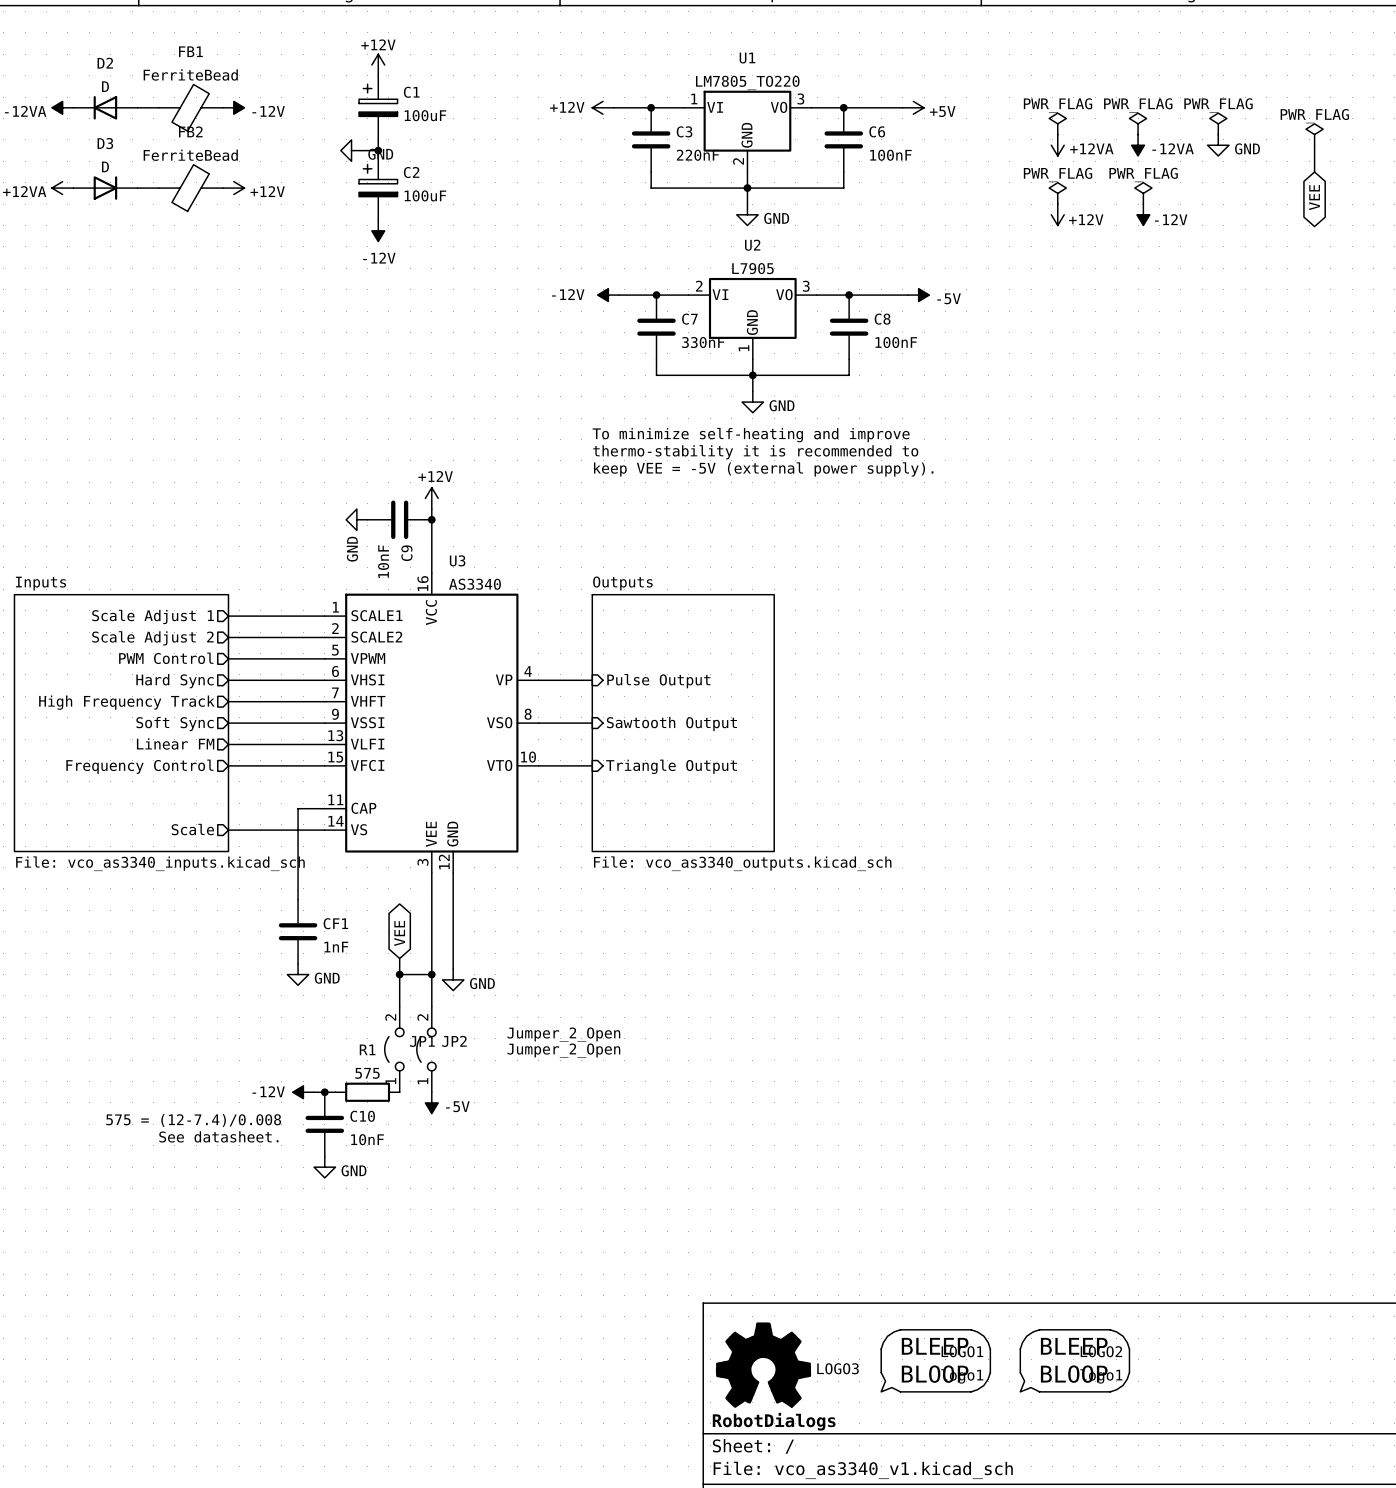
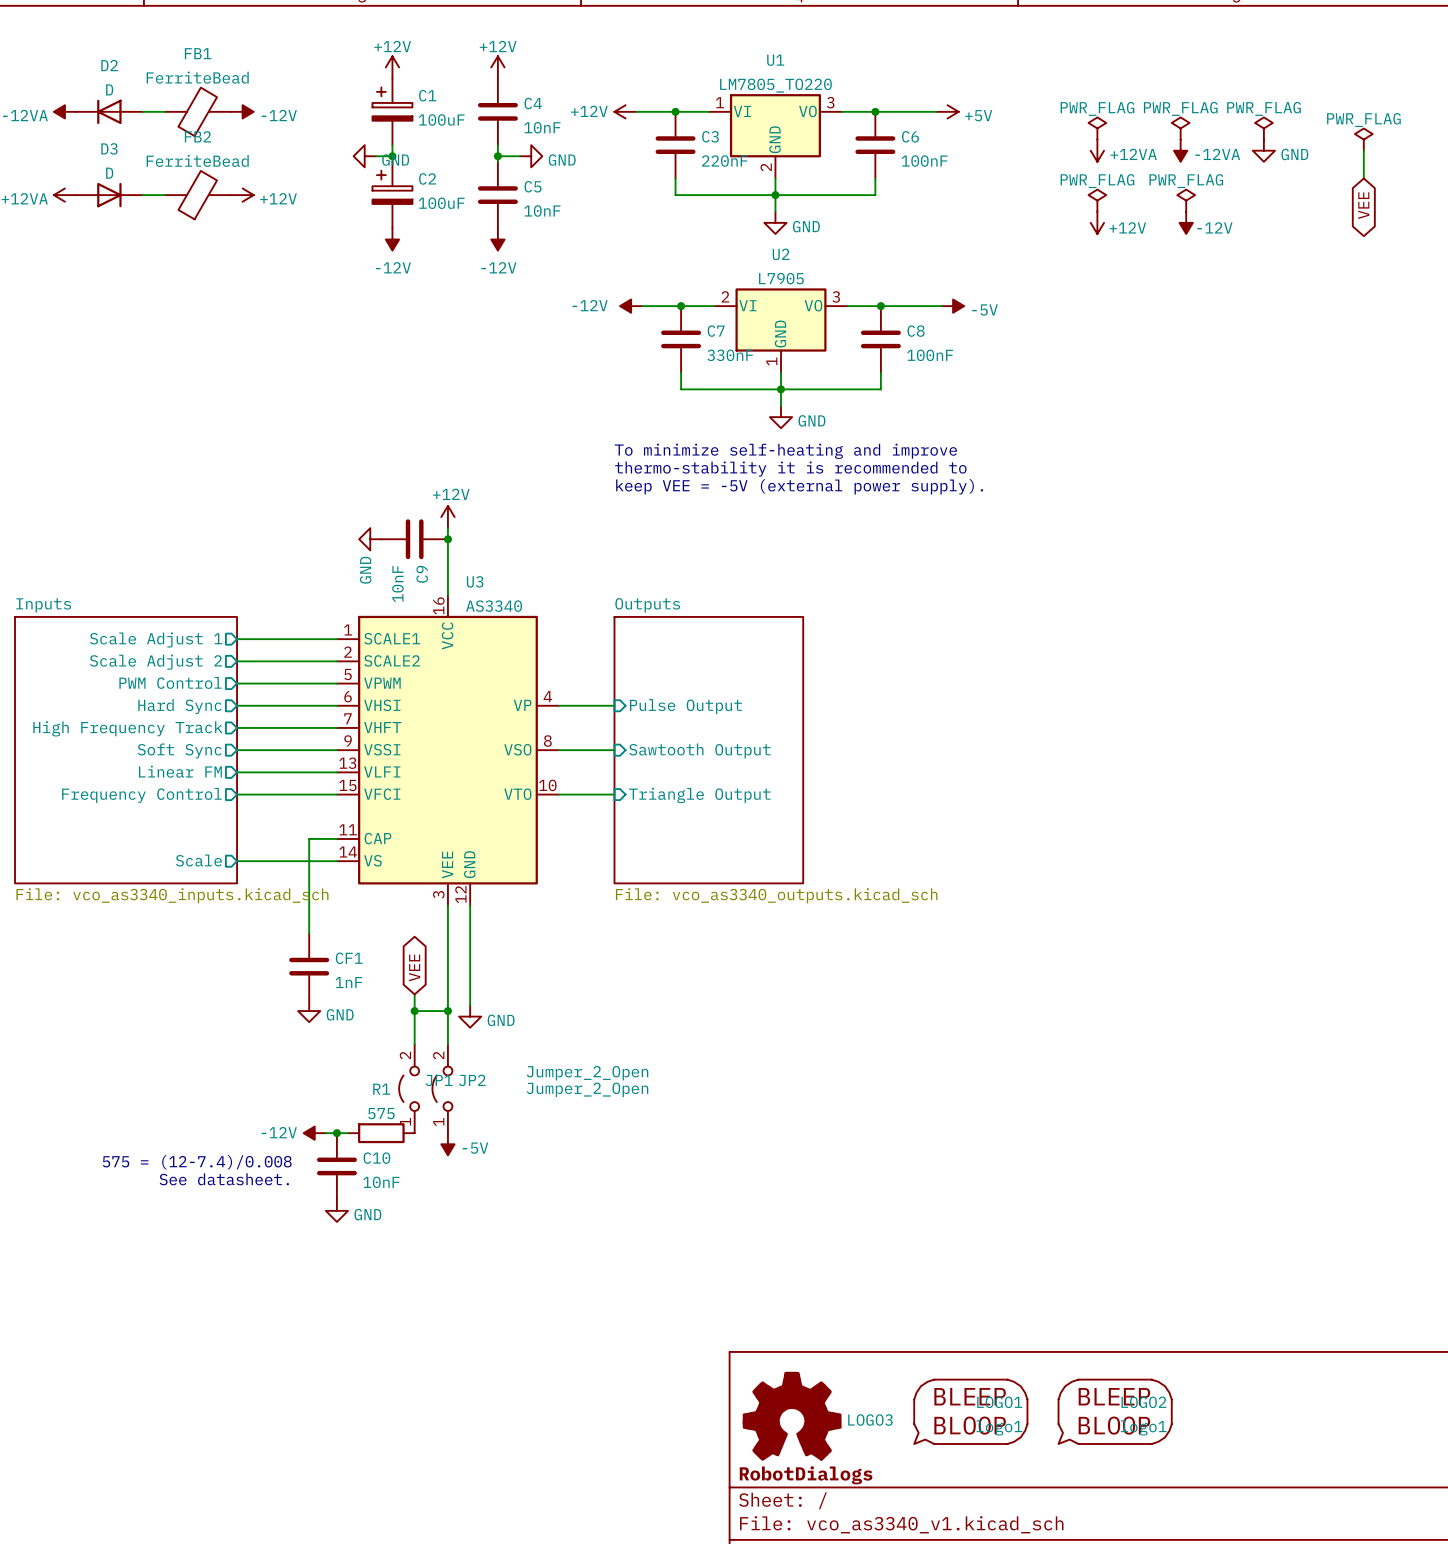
power symbol: none -> +12V (497, 67)
C4: none -> 10nF (497, 111)
wire: none -> (497, 145) (497, 161)
wire: none -> (497, 156) (520, 156)
junction: none -> (497, 156)
power symbol: none -> GND (531, 156)
C5: none -> 10nF (497, 195)
power symbol: none -> -12V (497, 239)

